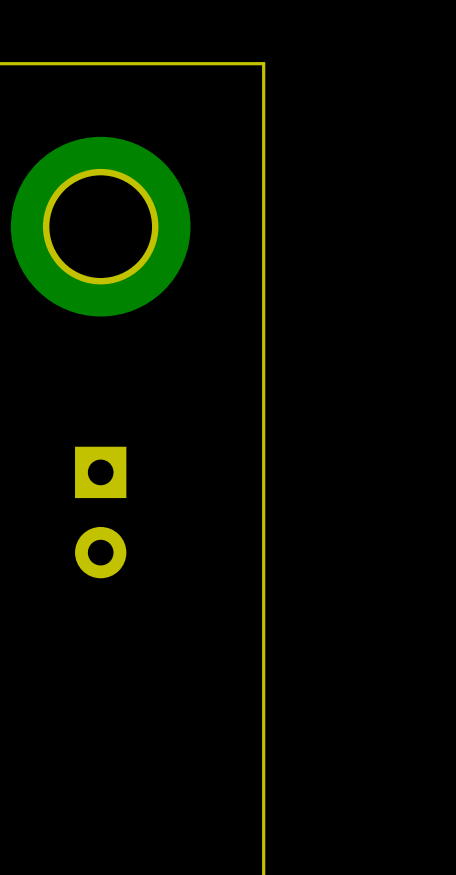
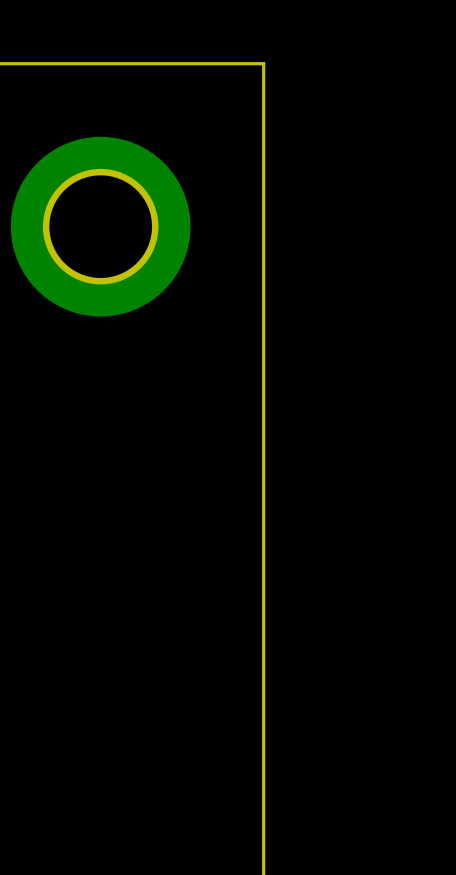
part: (100, 512) -> none

